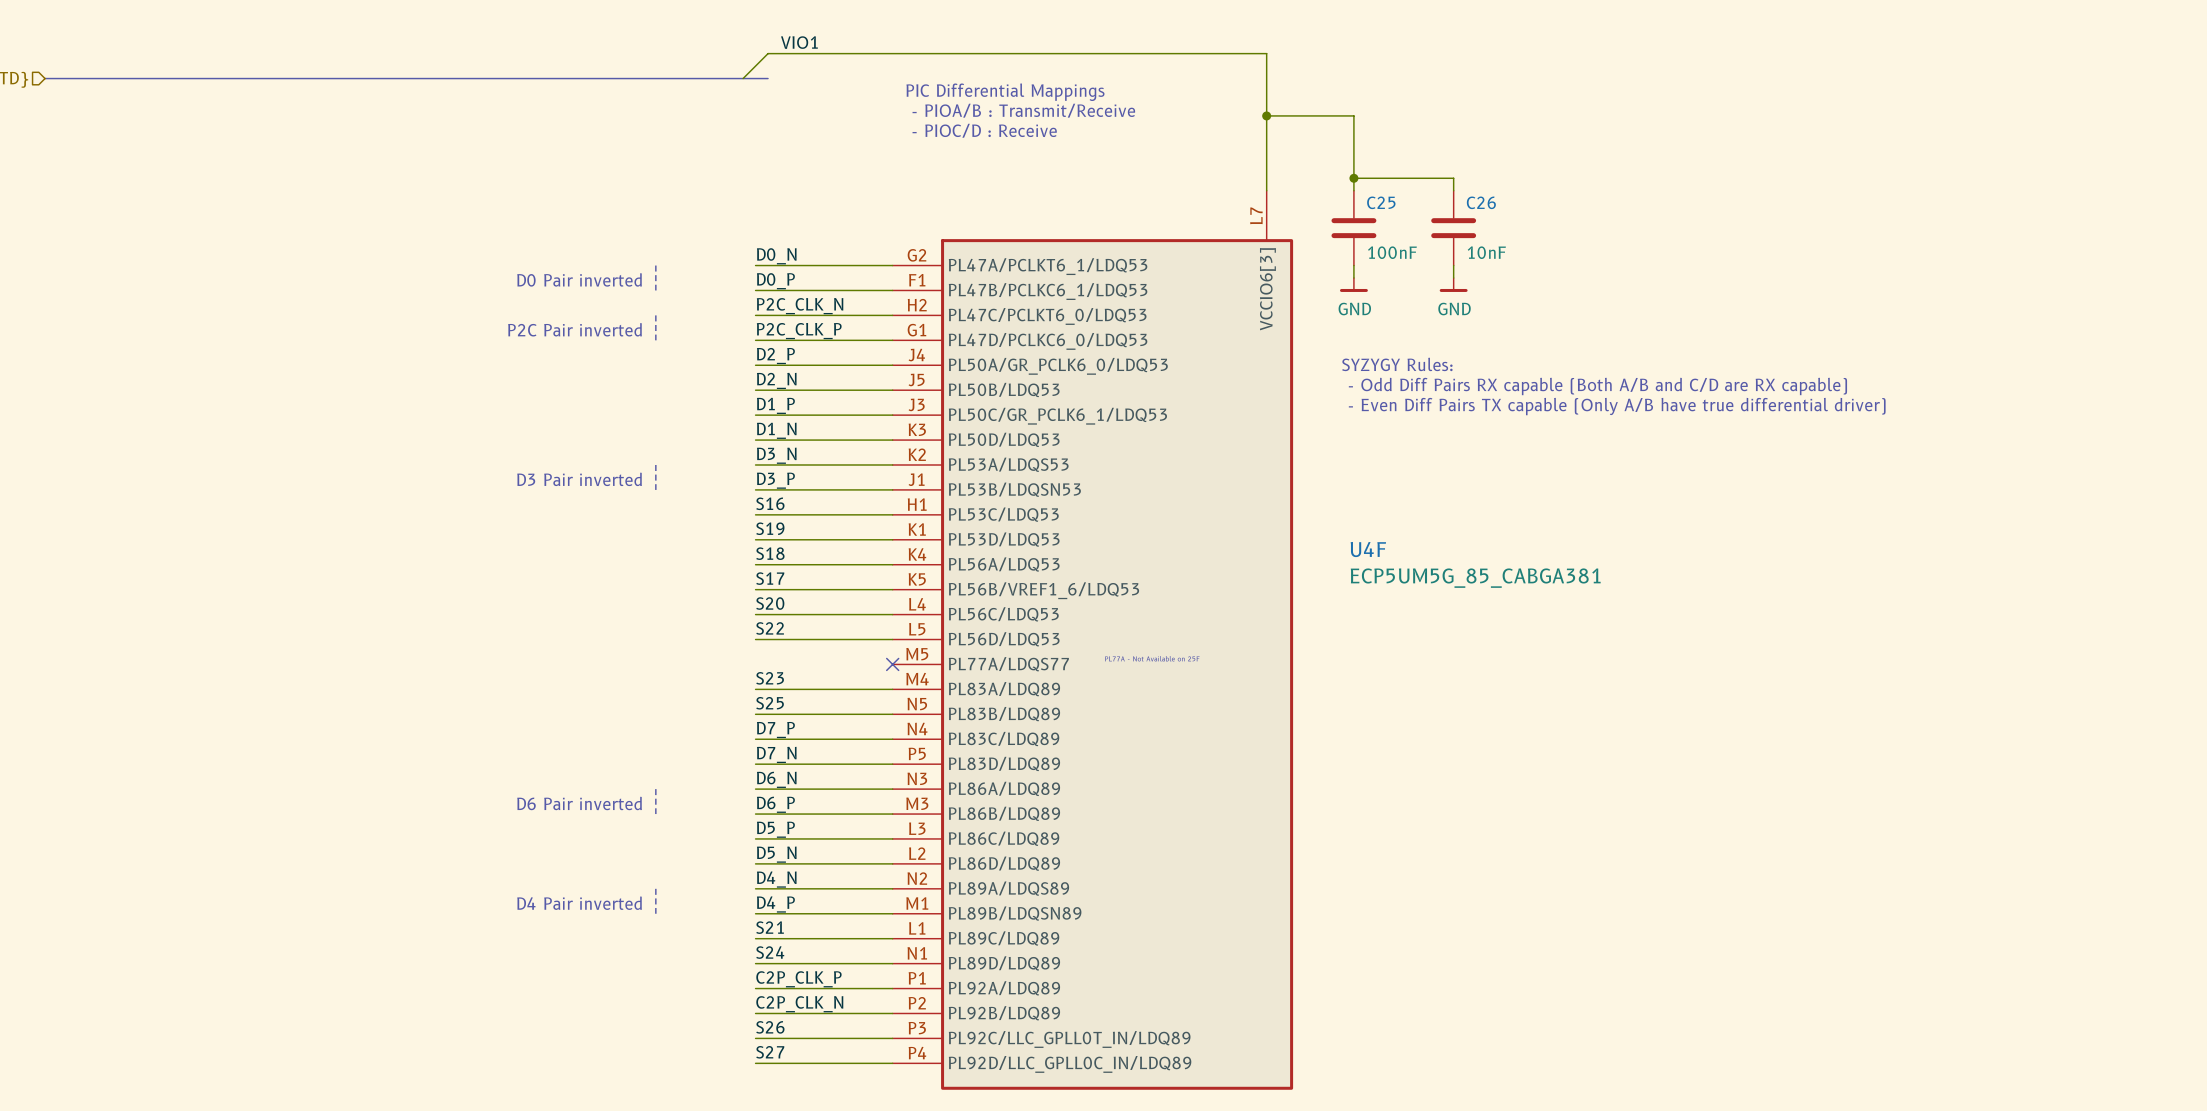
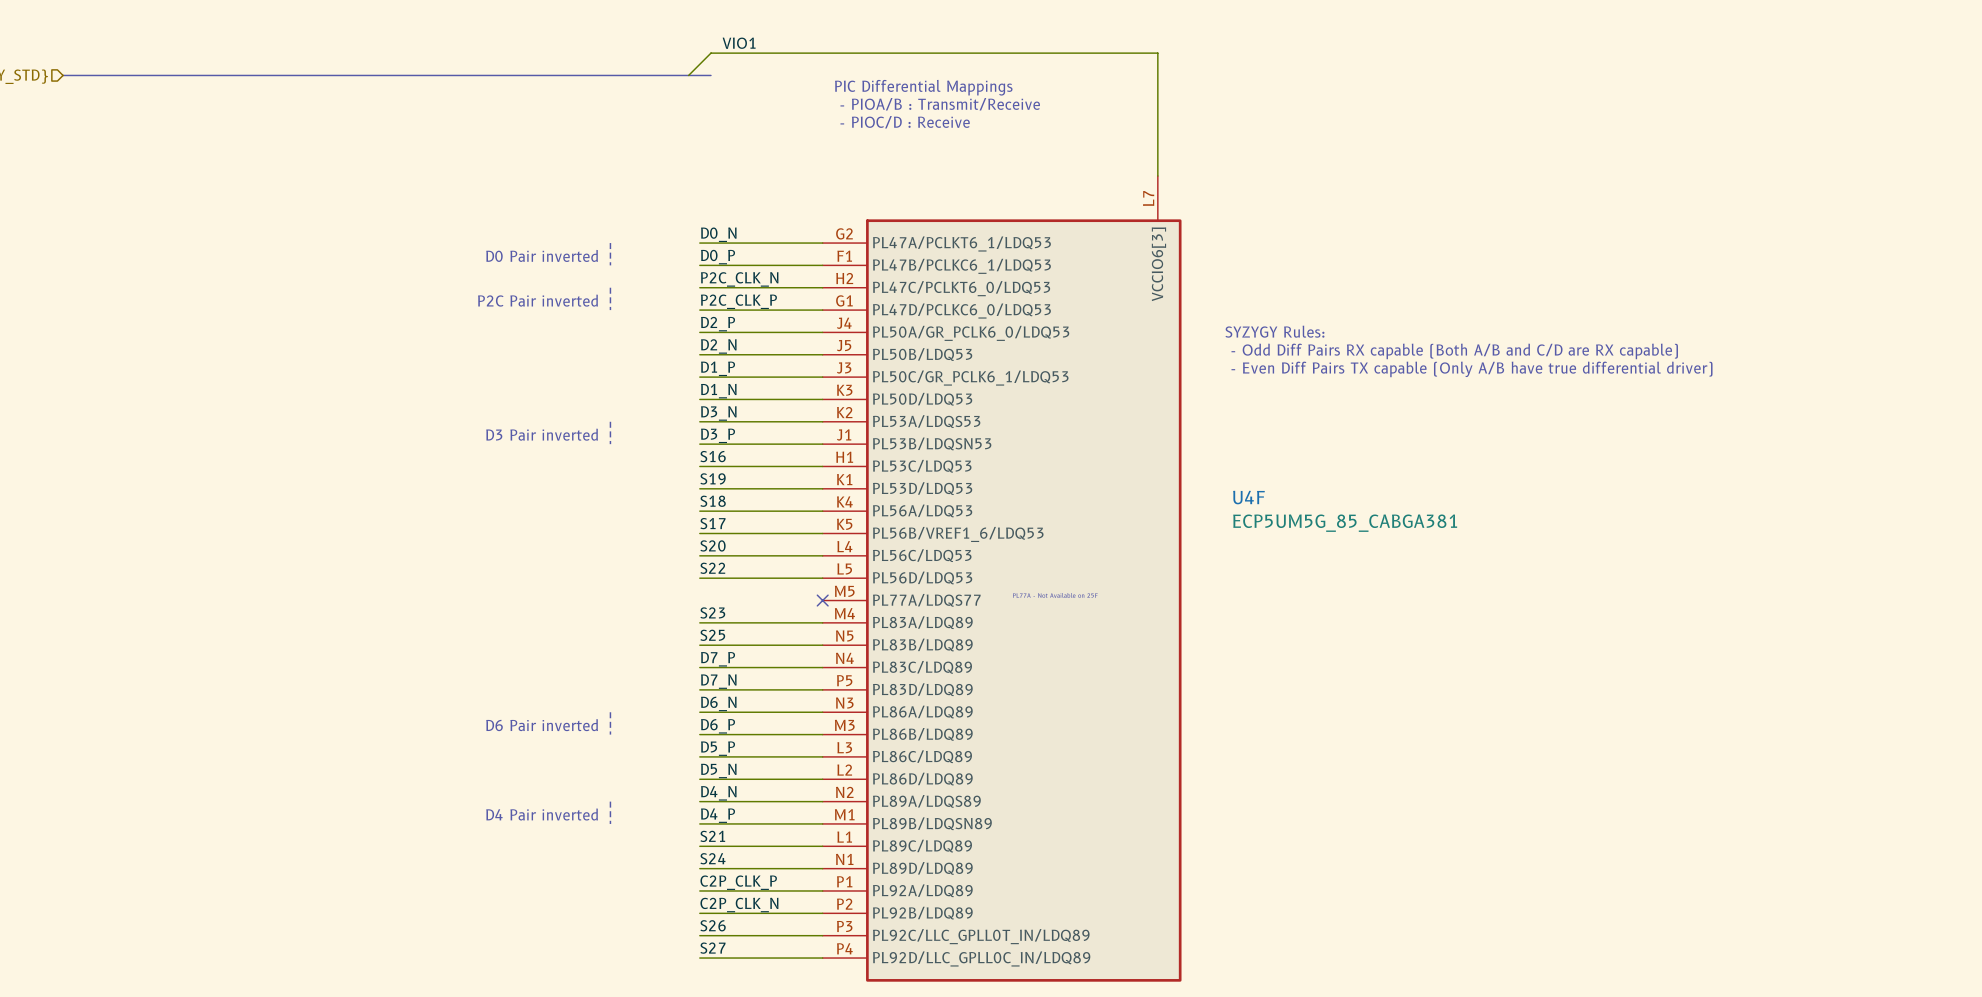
wire: (1266, 115) (1353, 115) (1353, 190) -> none
junction: (1266, 115) -> none
wire: (1353, 178) (1453, 178) (1453, 190) -> none
junction: (1353, 178) -> none
C25: 100nF (1353, 228) -> none
C26: 10nF (1453, 228) -> none
wire: (1353, 265) (1353, 278) -> none
wire: (1453, 265) (1453, 278) -> none
power symbol: GND (1353, 284) -> none
power symbol: GND (1453, 284) -> none

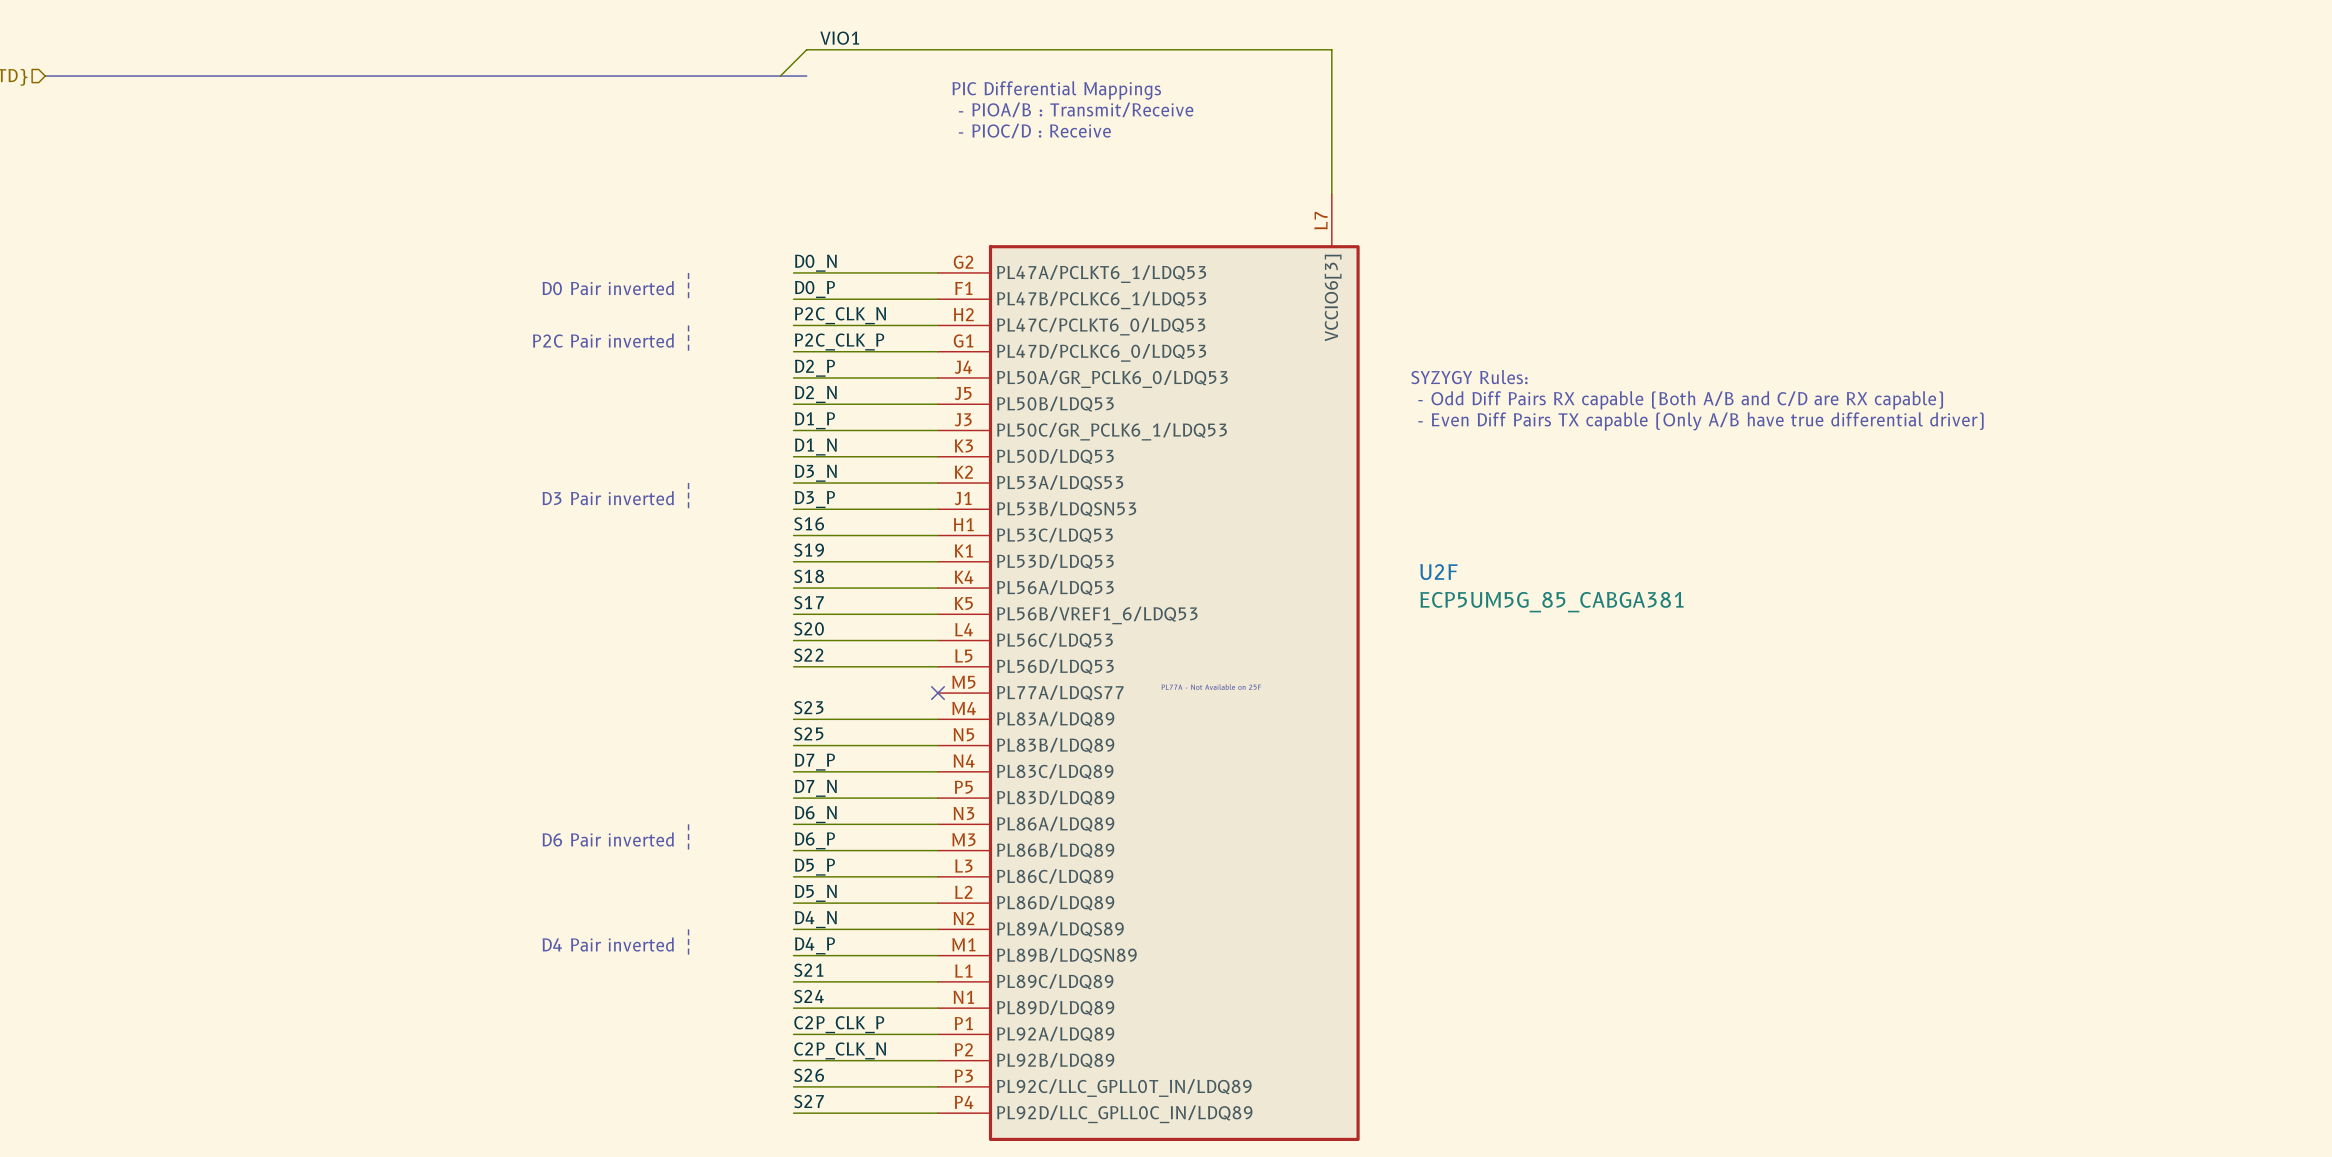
U4F name: U4F (1248, 497) -> U2F (1438, 572)

